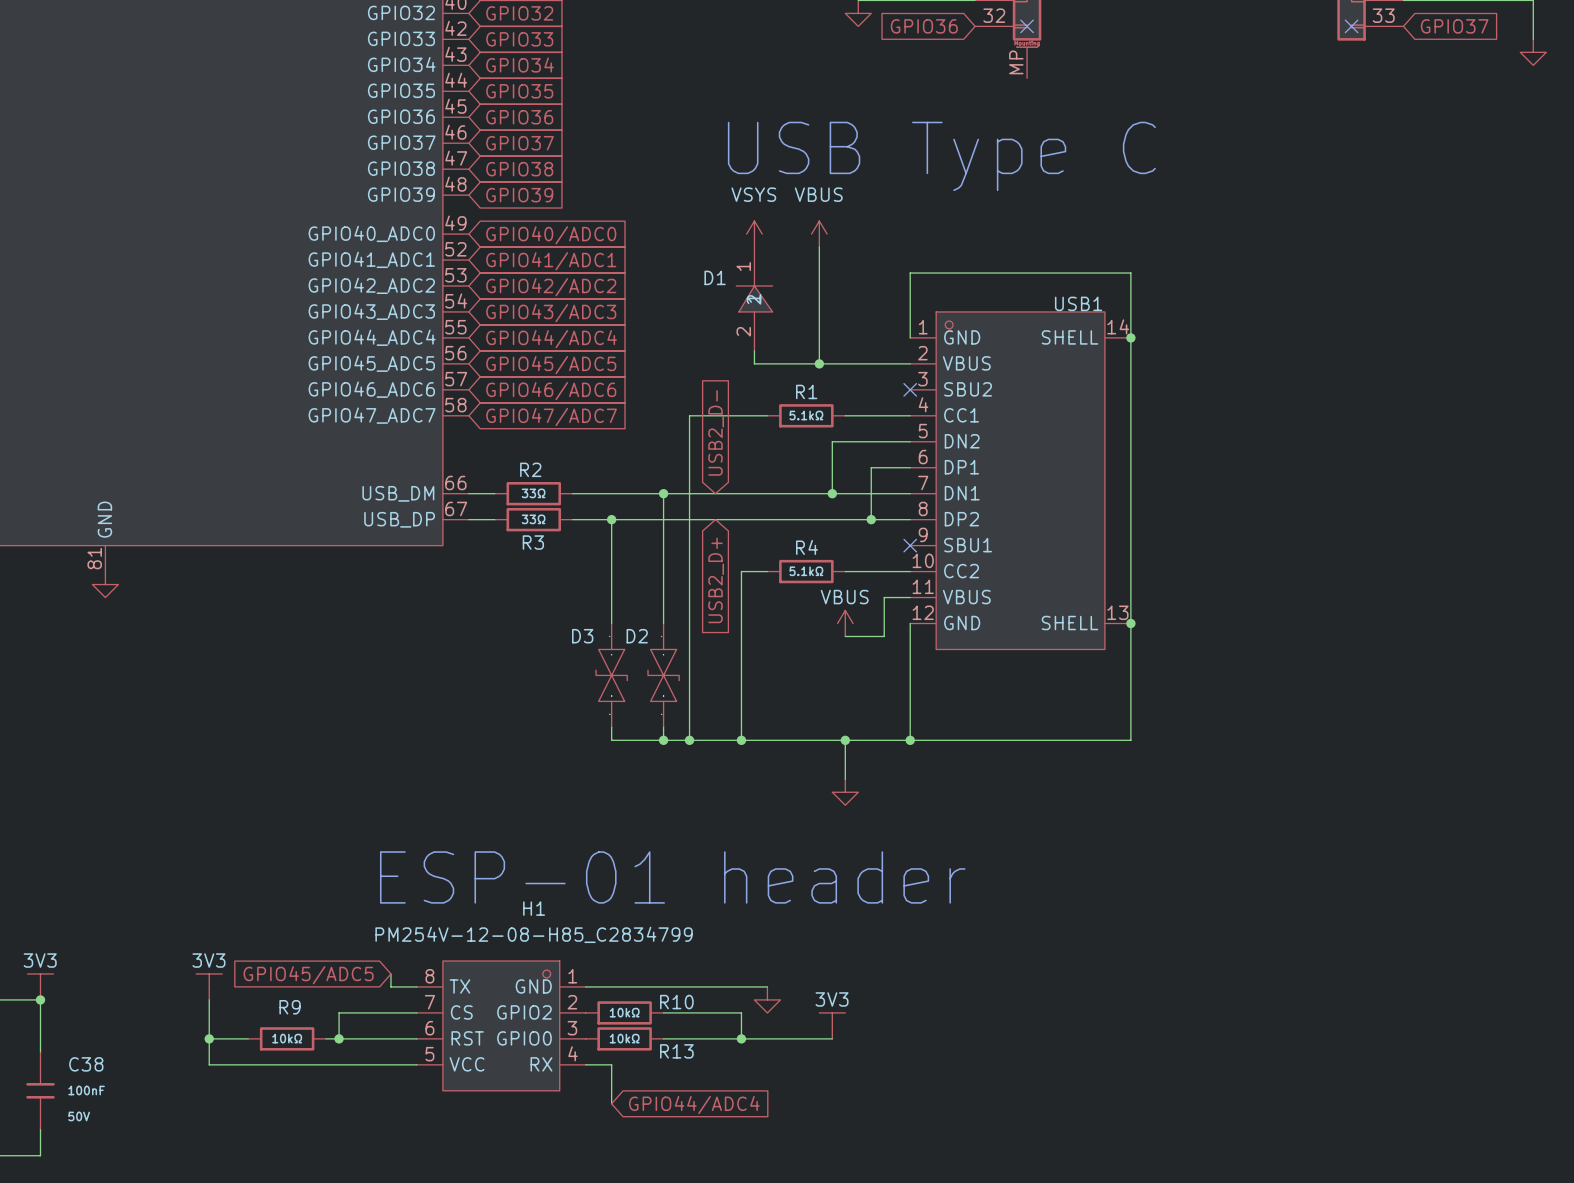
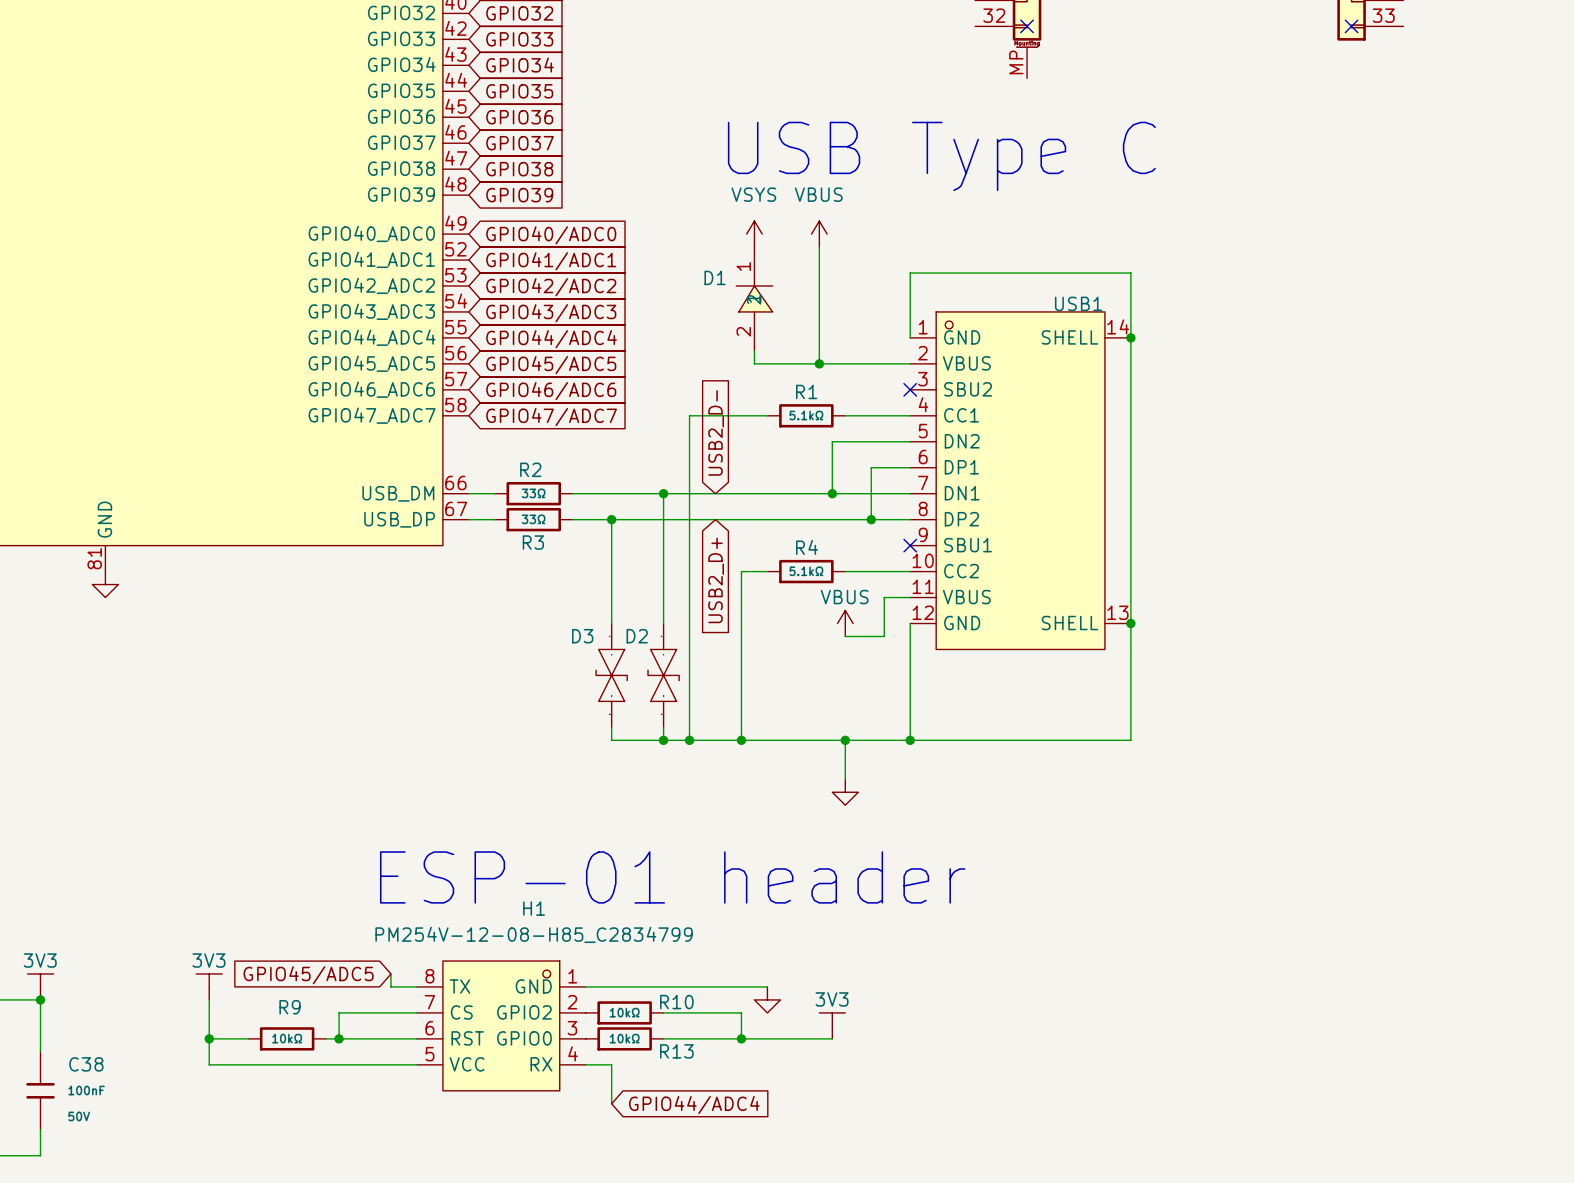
wire: (858, 0) (975, 0) -> none
wire: (1403, 0) (1533, 0) (1533, 39) -> none
power symbol: (858, 13) -> none
global label: GPIO36 (924, 26) -> none
global label: GPIO37 (1454, 26) -> none
power symbol: (1533, 52) -> none

